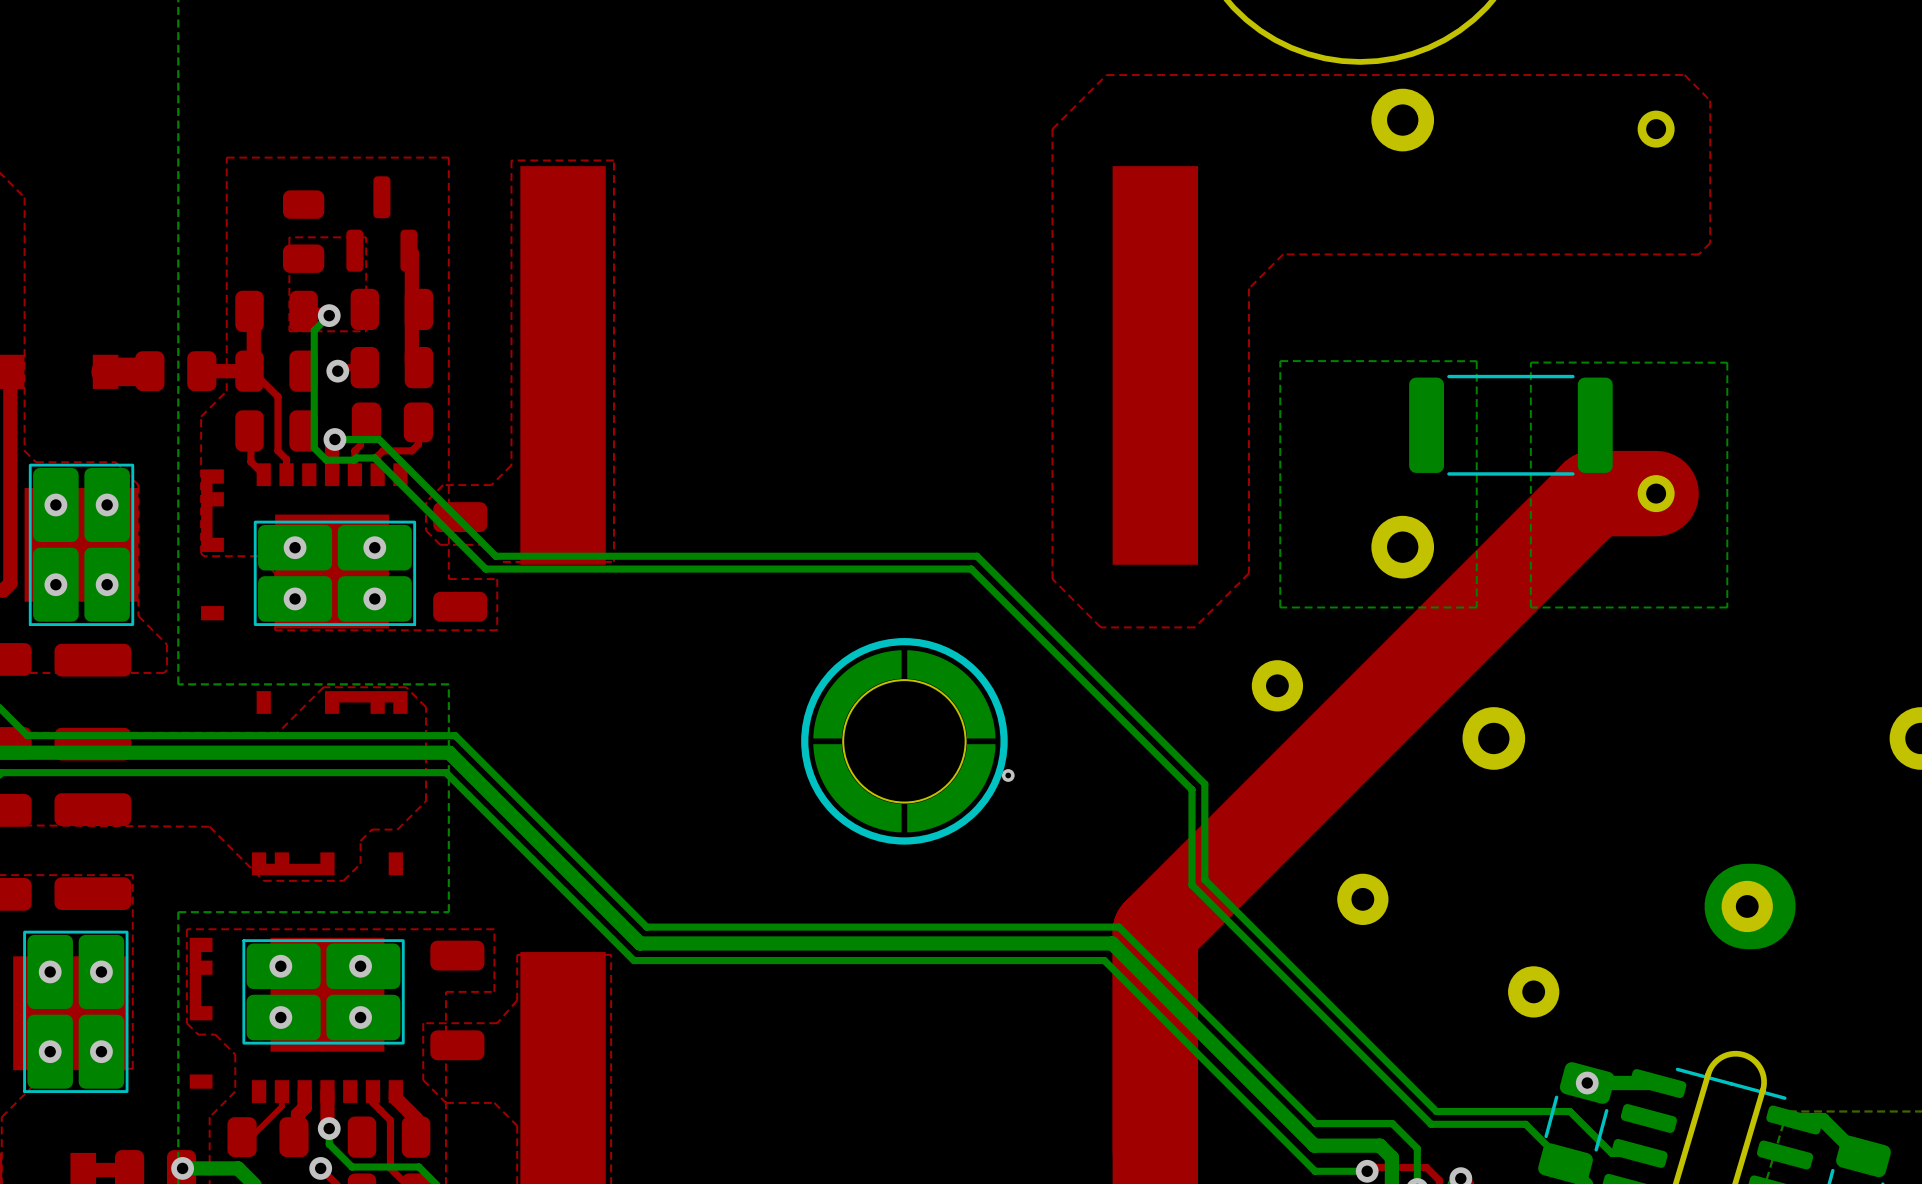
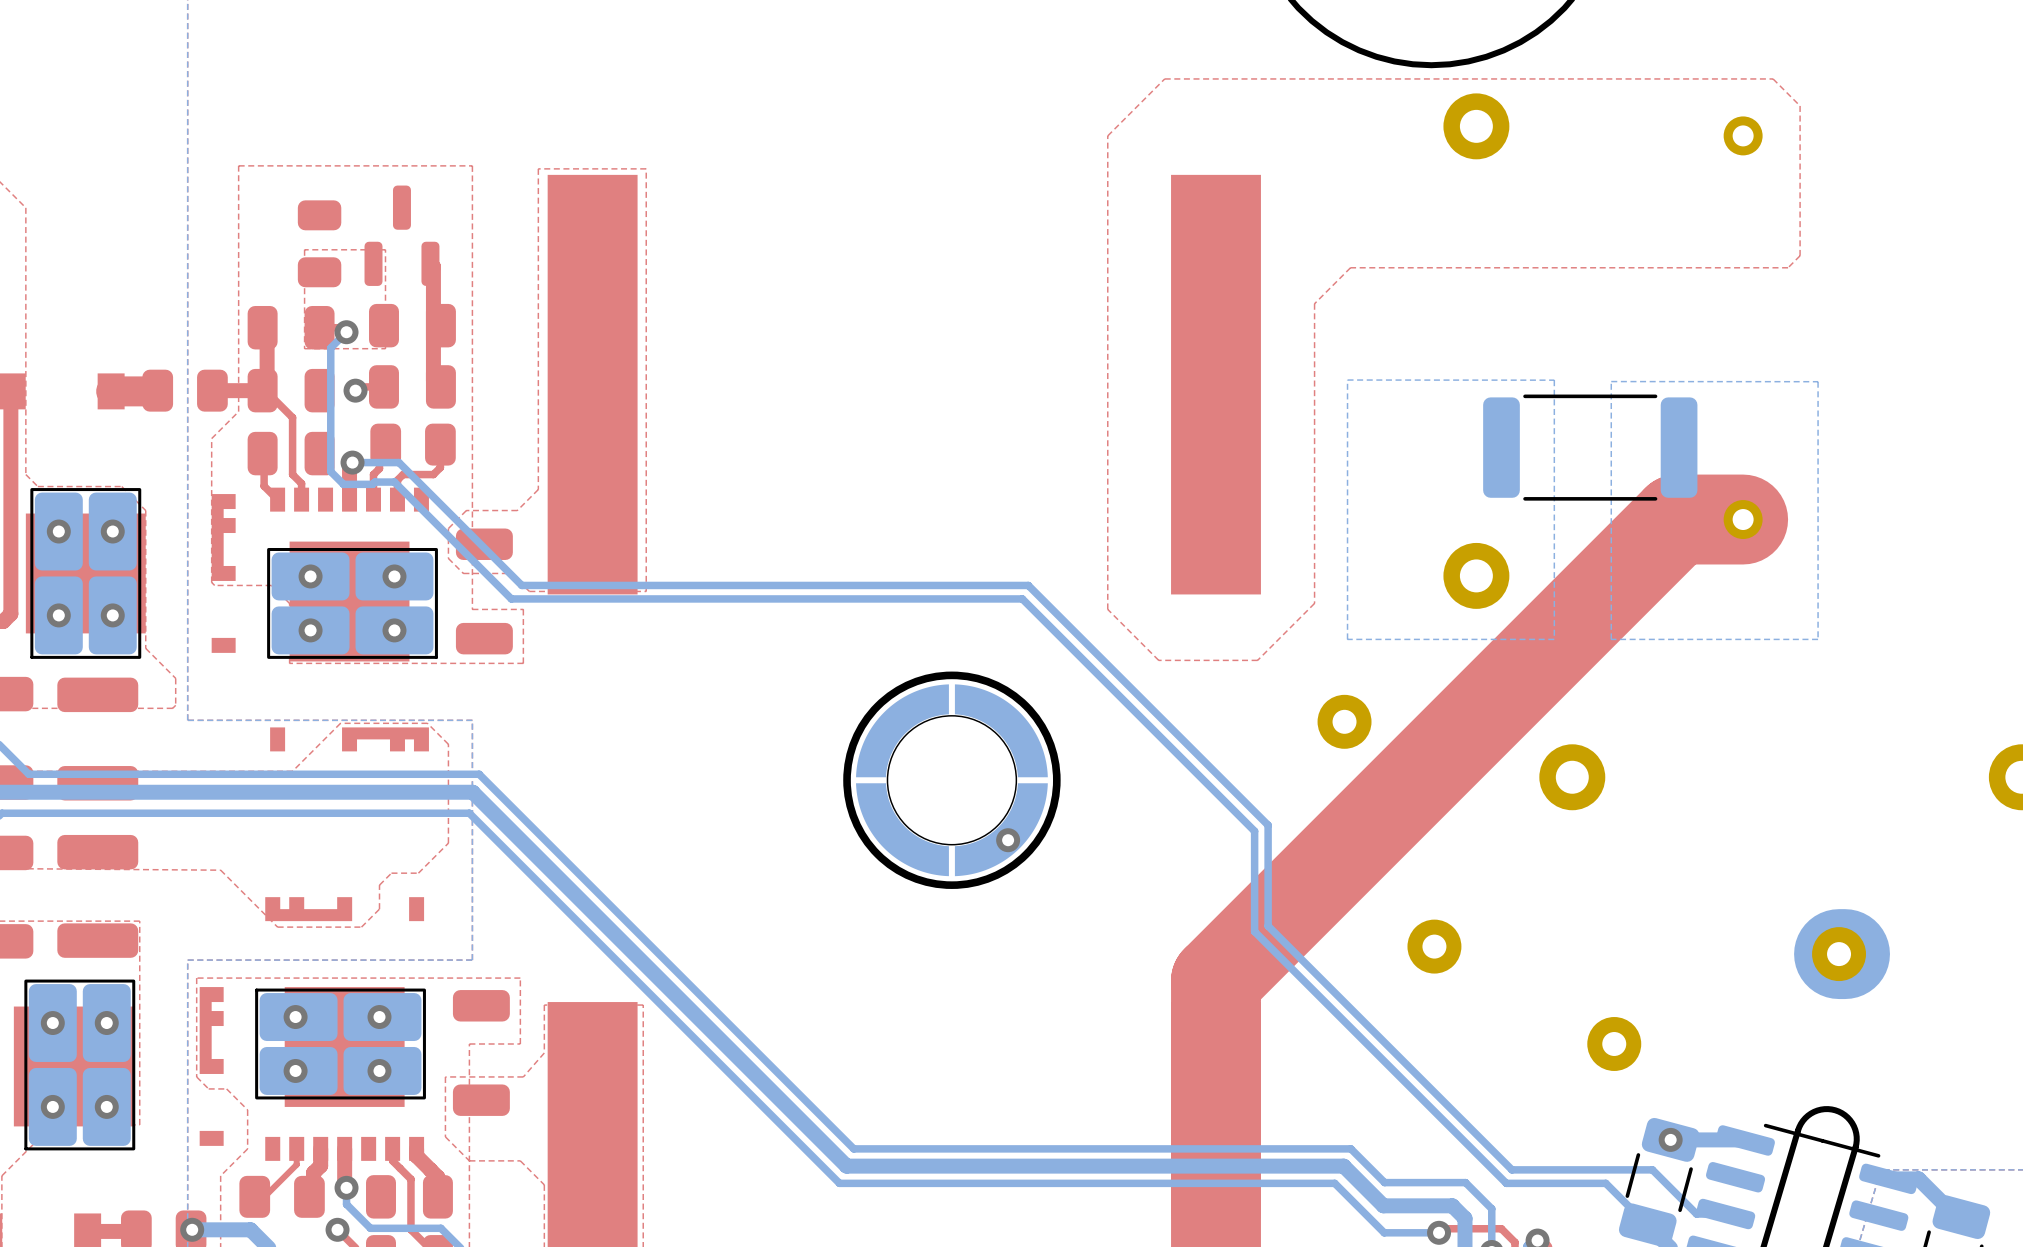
via: (1008, 775) -> none
via: none -> (1008, 840)
bottom track: (646, 927) (1119, 927) (1283, 1091) -> (680, 975) (853, 1148) (1350, 1148)
bottom track: (639, 943) (1112, 943) (1276, 1107) -> (673, 993) (846, 1166) (1343, 1166)
bottom track: (633, 960) (1104, 960) (1268, 1124) -> (667, 1011) (839, 1183) (1334, 1183)

